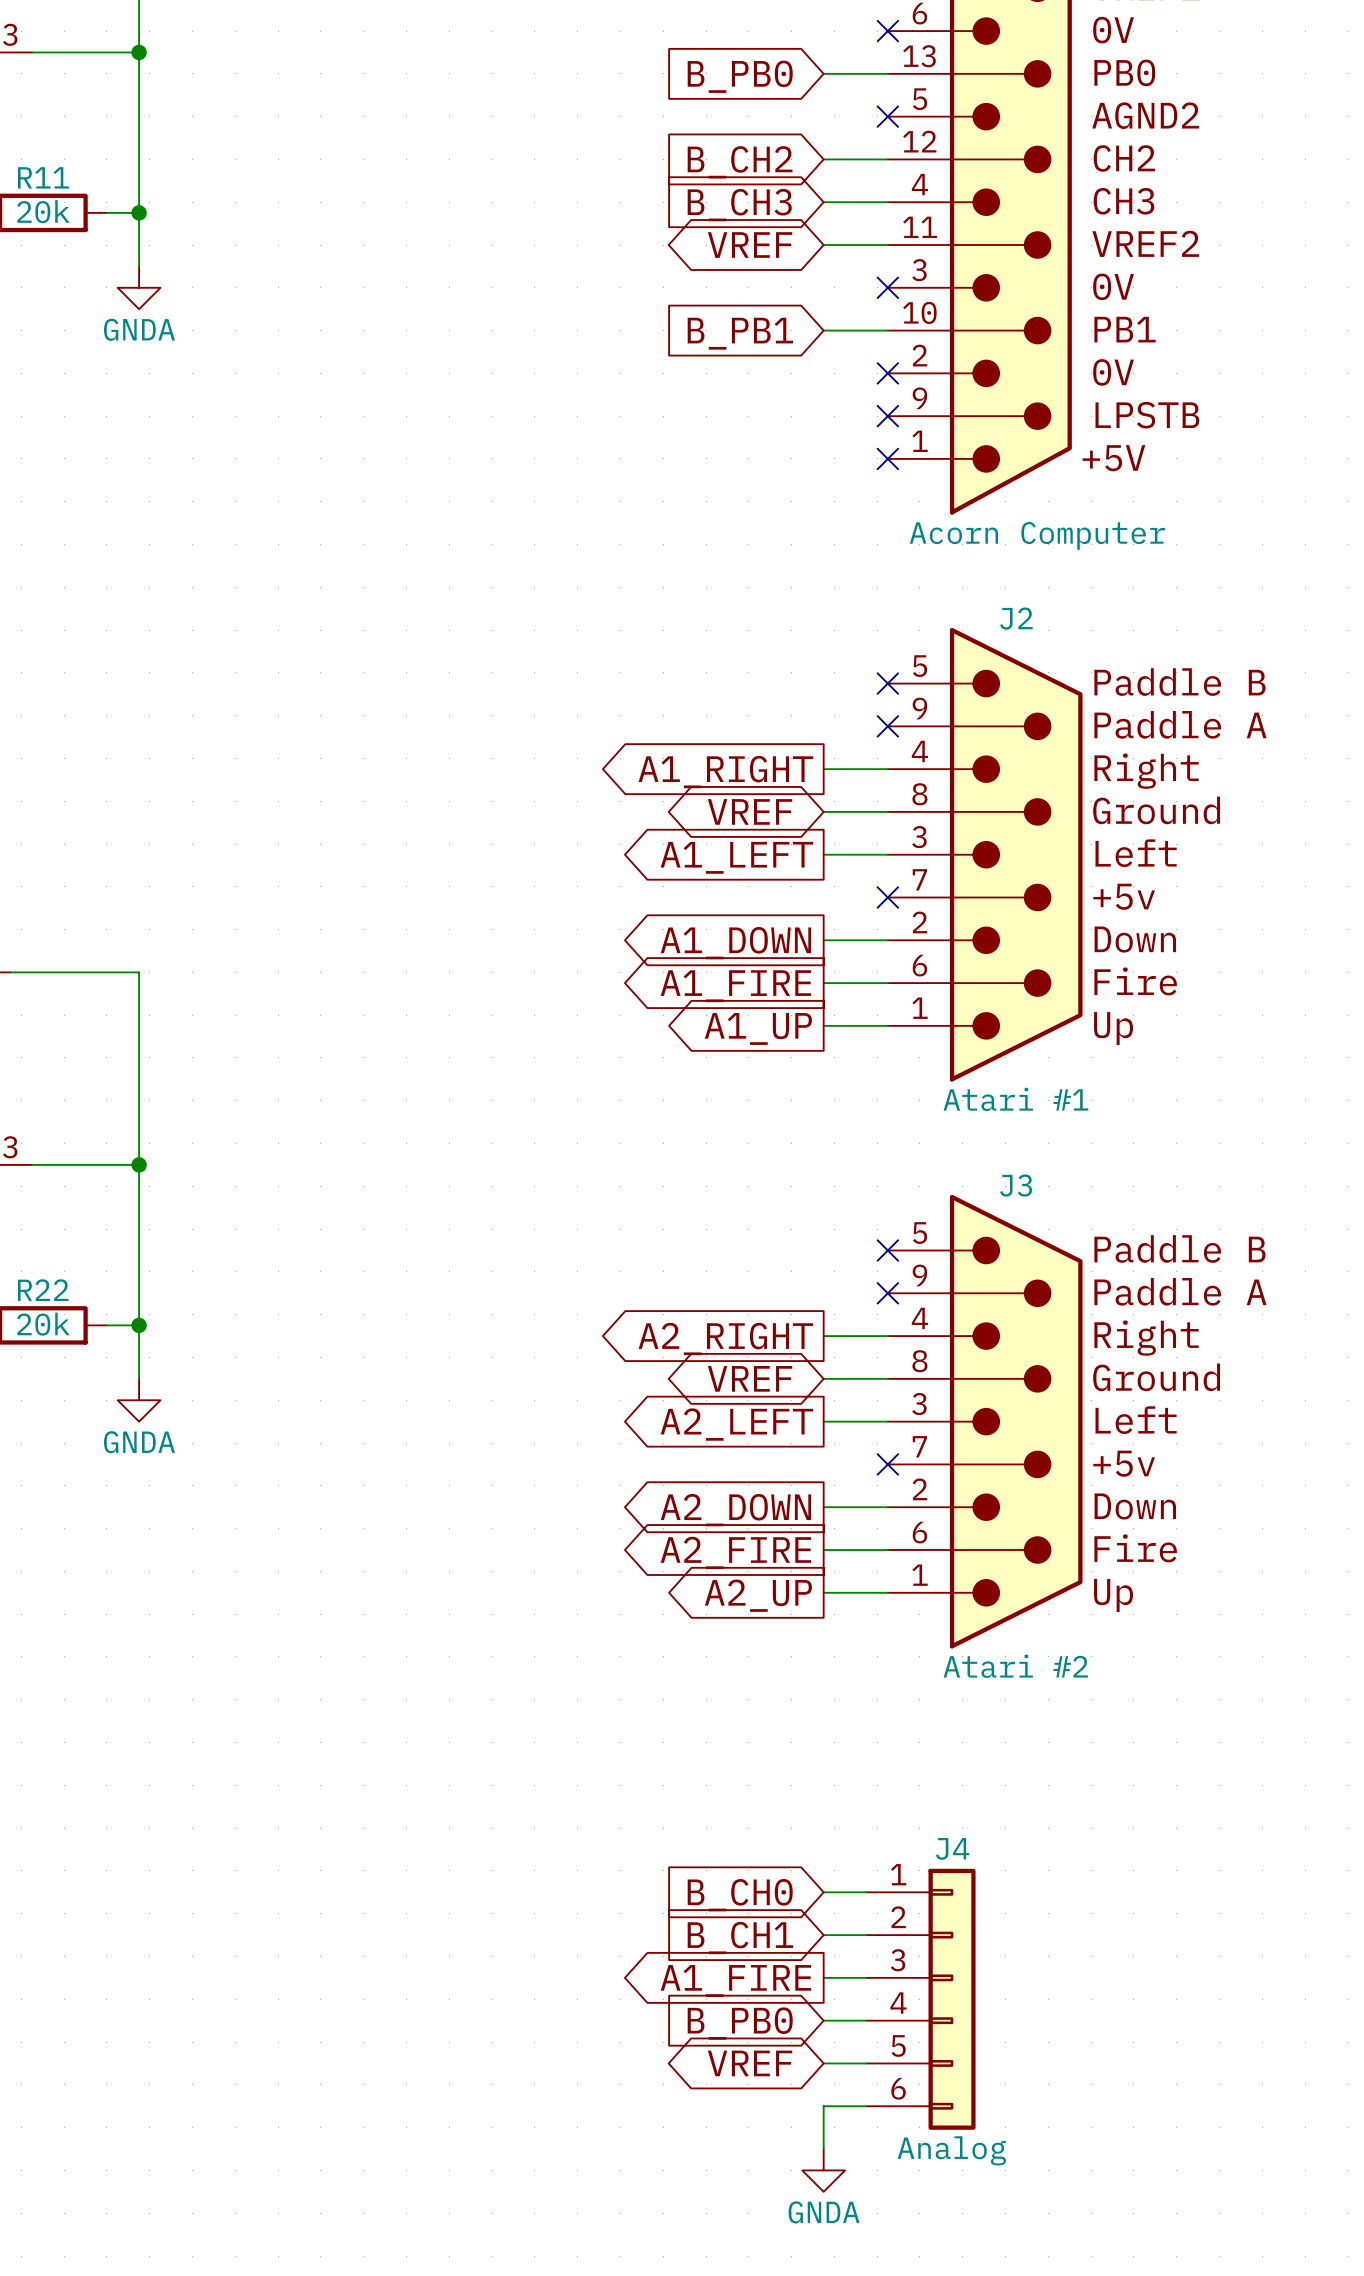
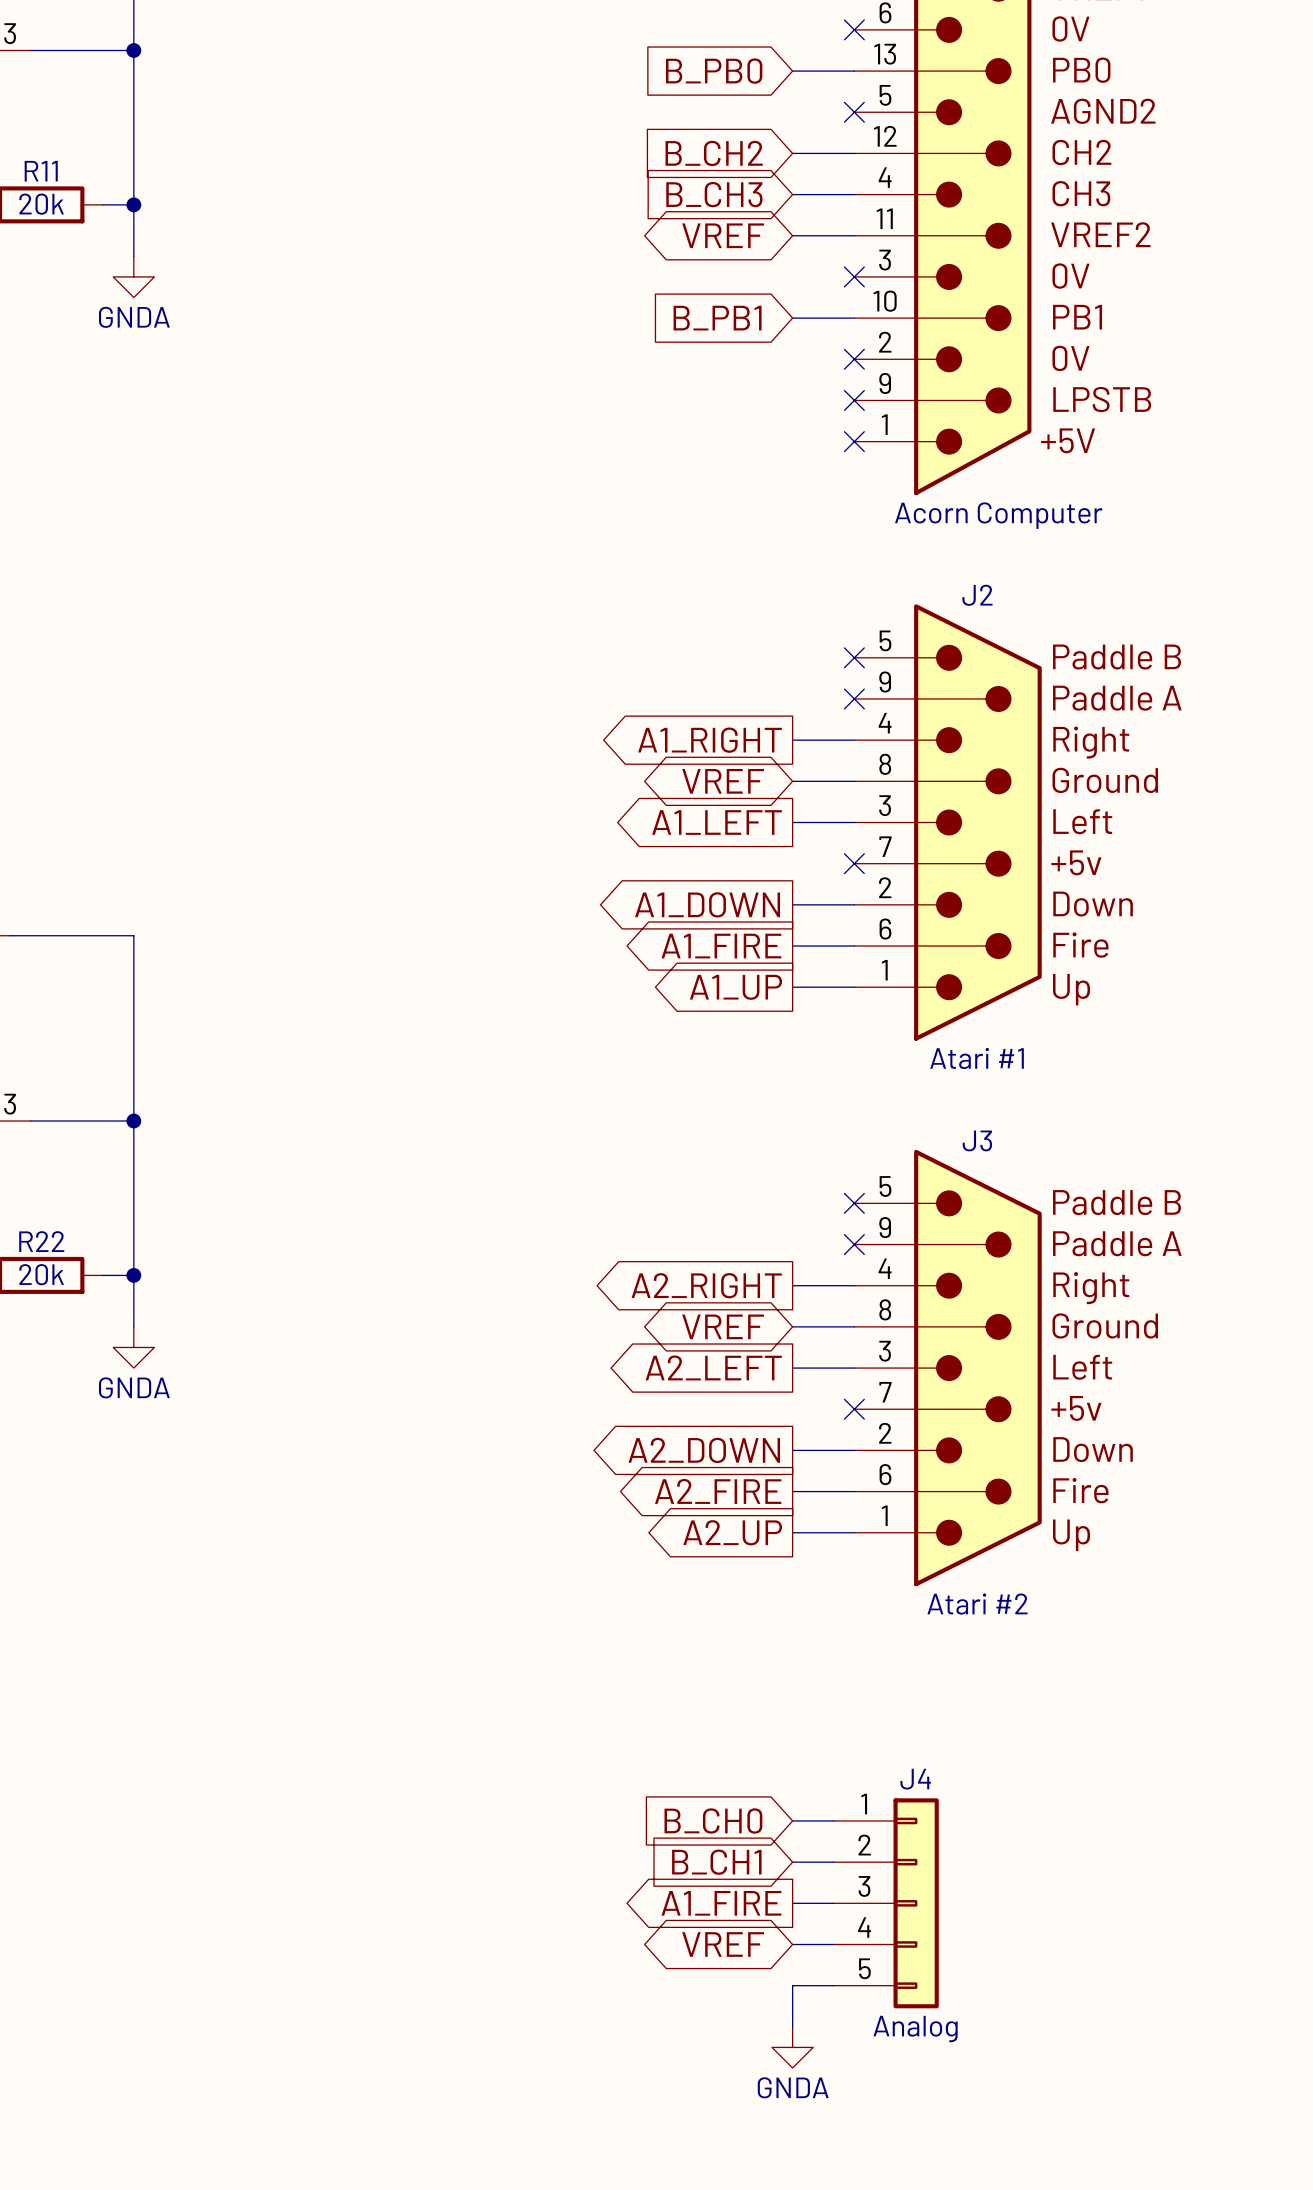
J4 symbol: [866, 1868, 976, 2130] -> [833, 1798, 939, 2009]
global label shape: input (740, 2023) -> bidirectional (723, 1944)
global label: B_PB0 (740, 2023) -> VREF (723, 1944)
global label: VREF (750, 2063) -> none
wire: none -> (792, 1985) (792, 2026)
wire: (866, 2106) (823, 2106) (823, 2149) -> none
power symbol position: GNDA (823, 2170) -> GNDA (792, 2047)

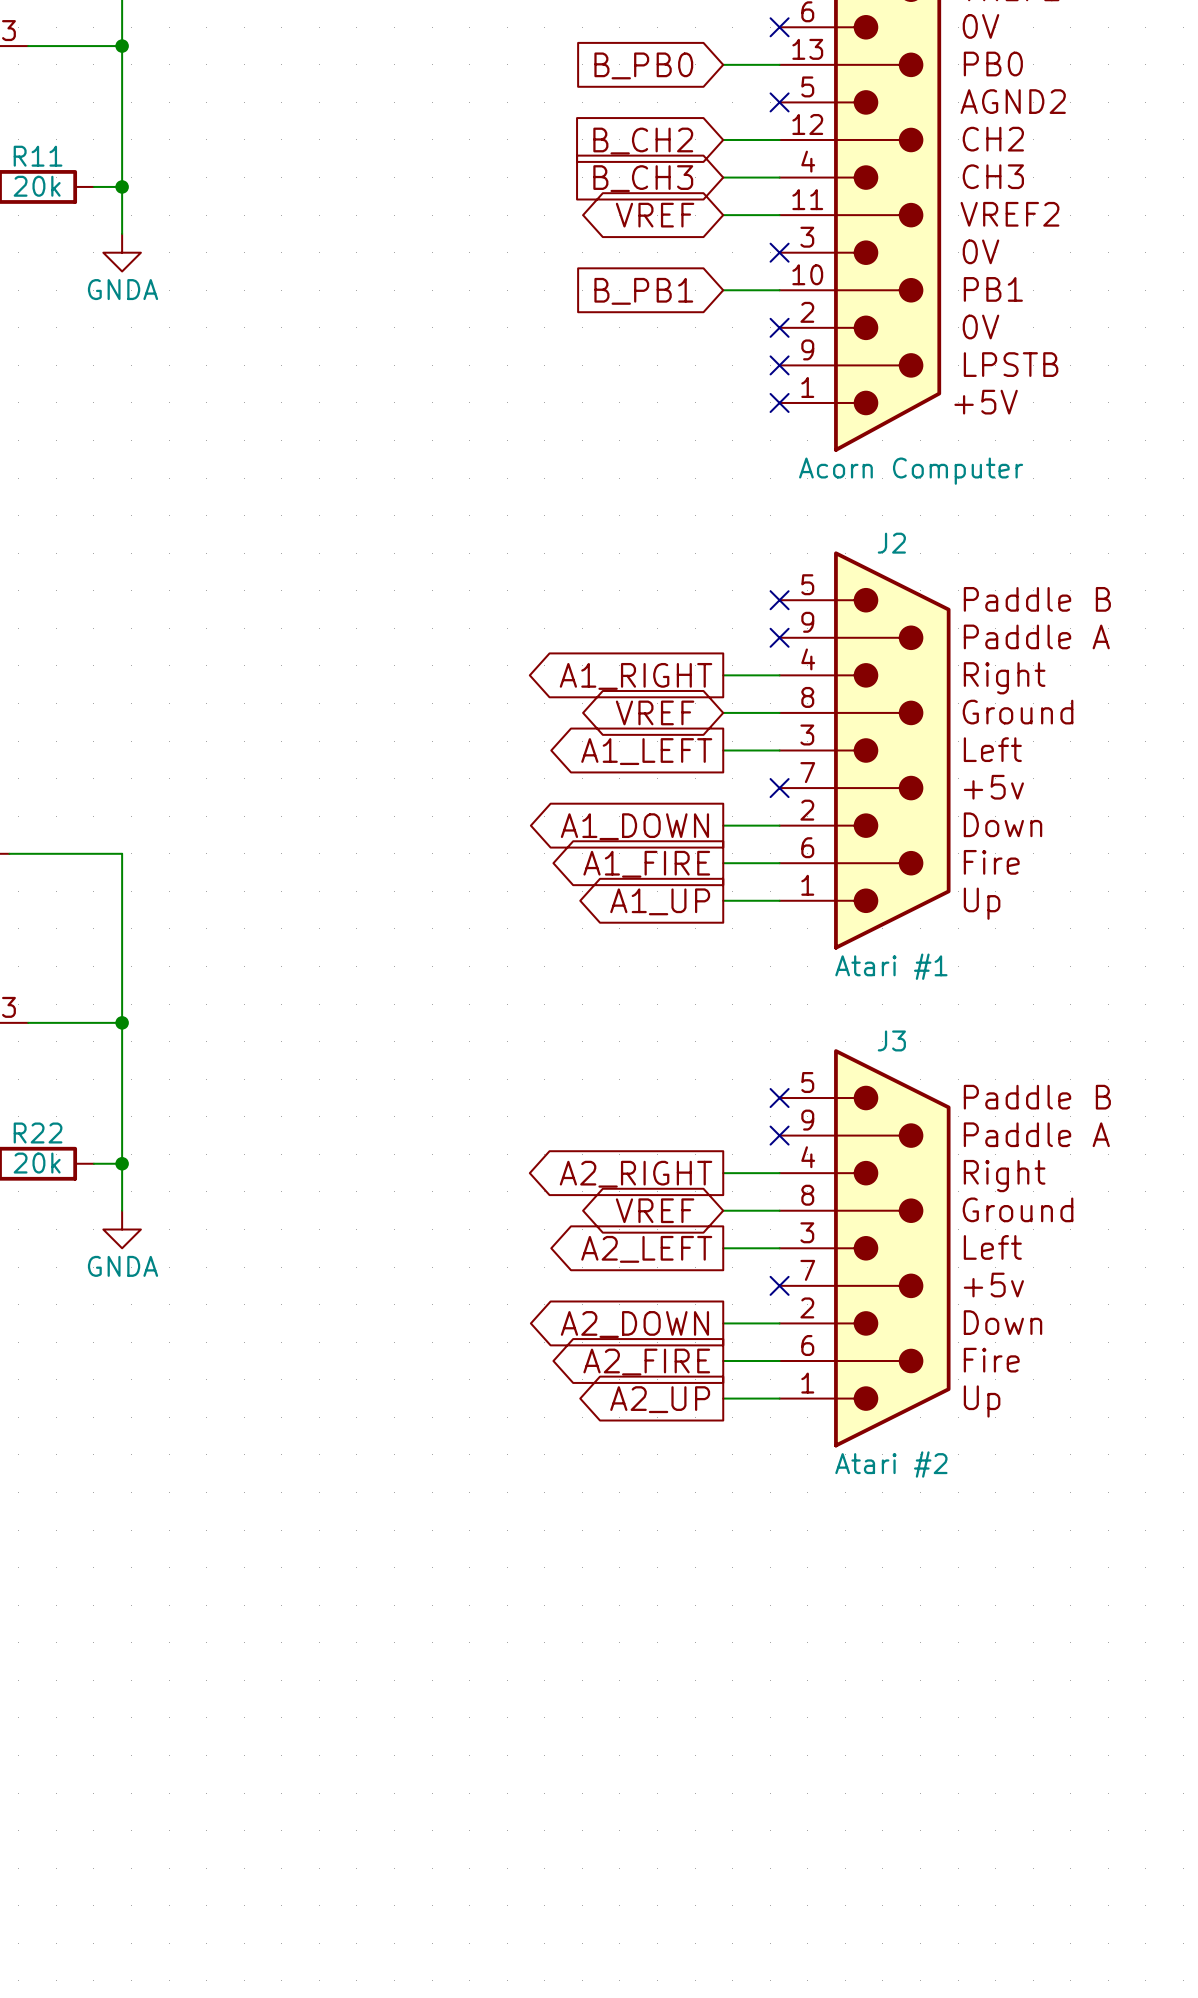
global label: B_CH0 (713, 1820) -> none
wire: (792, 1820) (833, 1820) -> none
global label: B_CH1 (716, 1862) -> none
wire: (792, 1862) (833, 1862) -> none
global label: A1_FIRE (721, 1903) -> none
wire: (792, 1903) (833, 1903) -> none
J4: Analog (886, 1903) -> none
global label: VREF (723, 1944) -> none
wire: (792, 1944) (833, 1944) -> none
wire: (833, 1985) (792, 1985) (792, 2026) -> none
power symbol: GNDA (792, 2047) -> none

